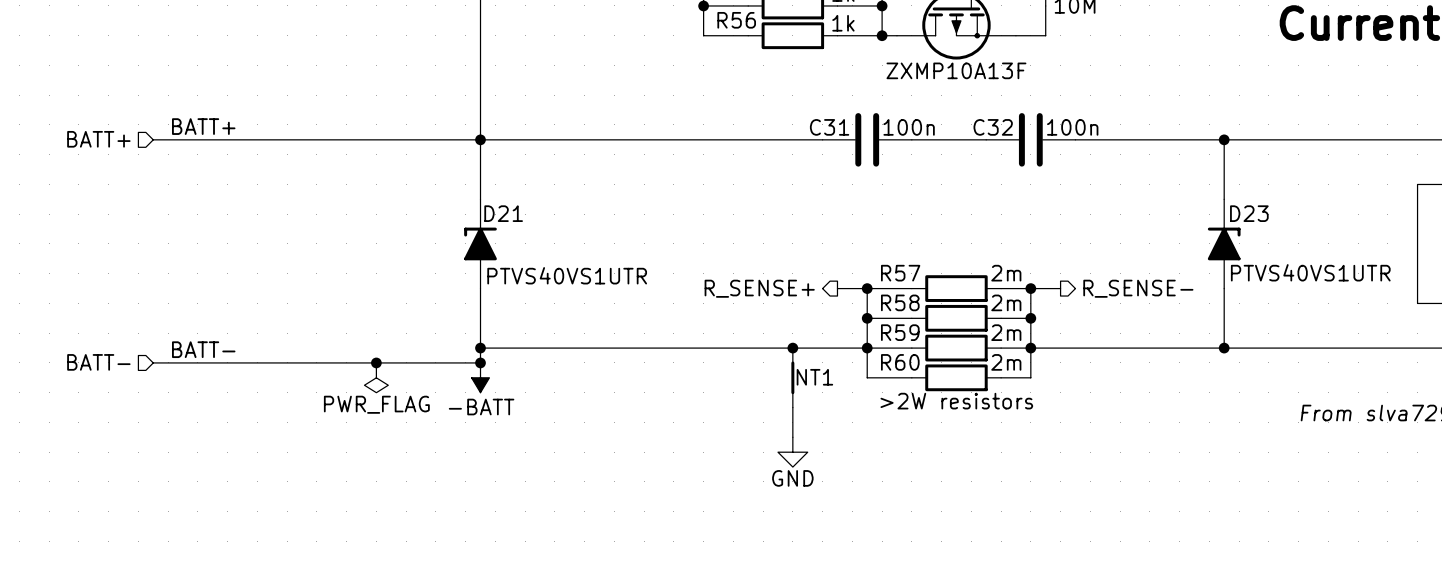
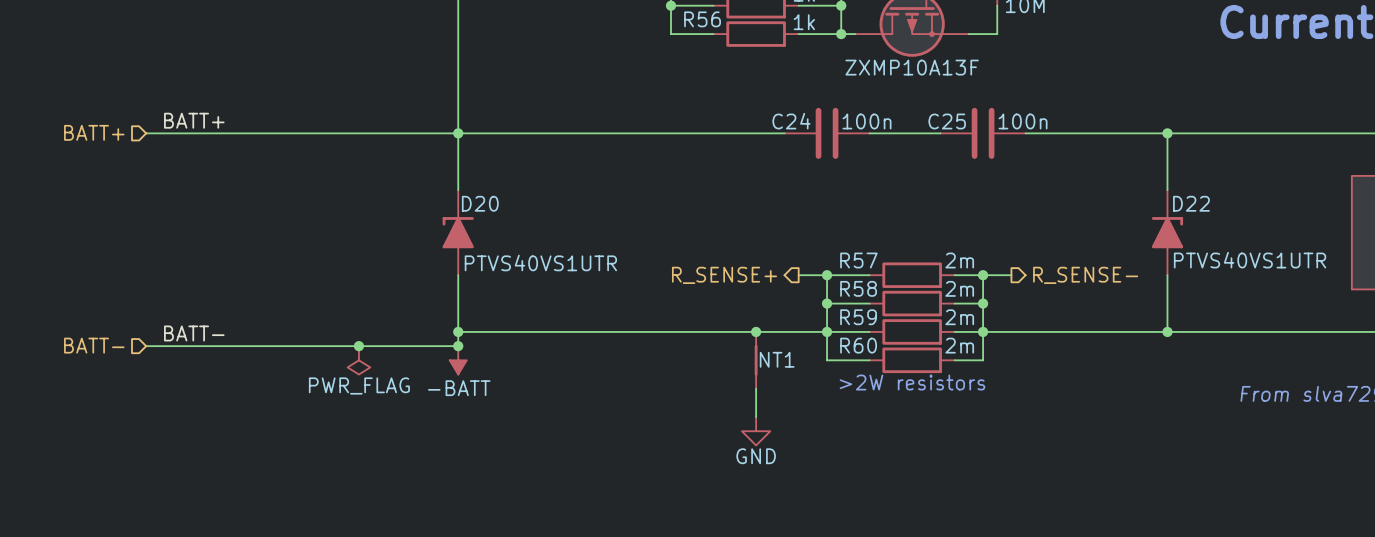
C31 name: C31 (829, 127) -> C24 (791, 121)
C32 name: C32 (993, 127) -> C25 (947, 121)
D21 name: D21 (503, 213) -> D20 (480, 203)
D23 name: D23 (1249, 213) -> D22 (1191, 203)

